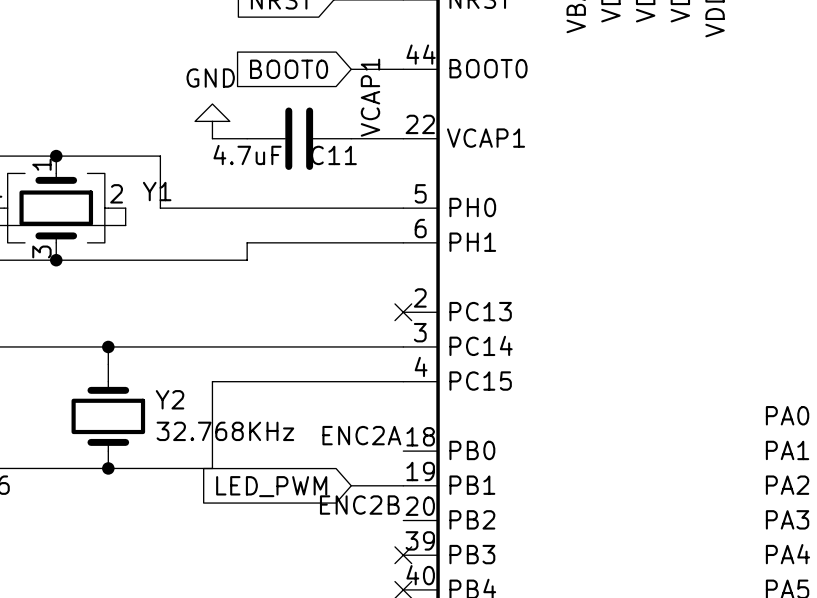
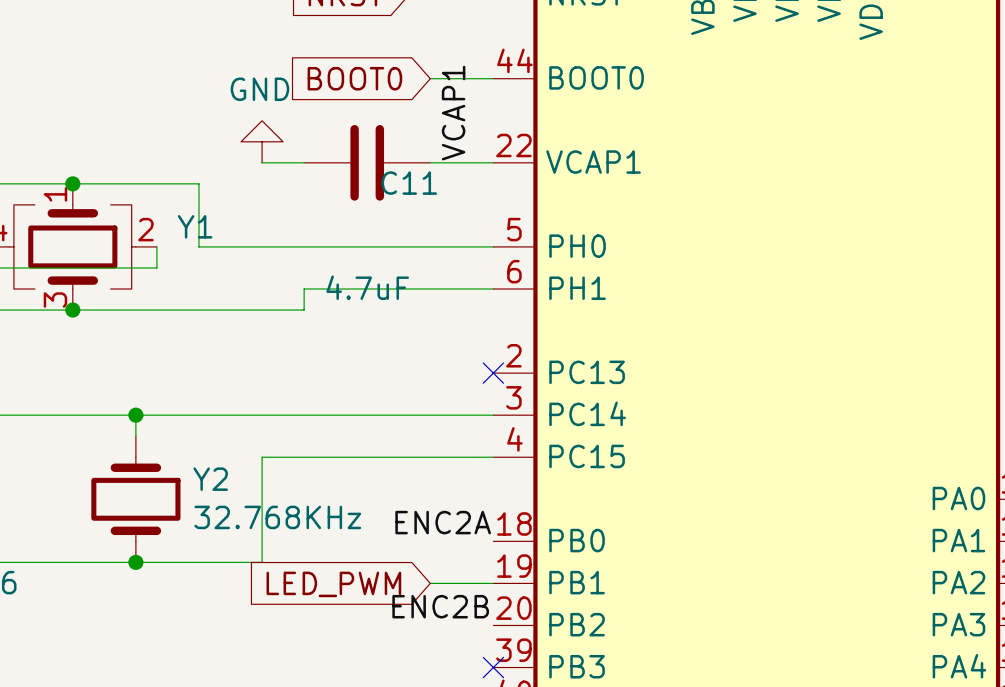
C11 value position: 4.7uF (247, 155) -> 4.7uF (367, 287)

